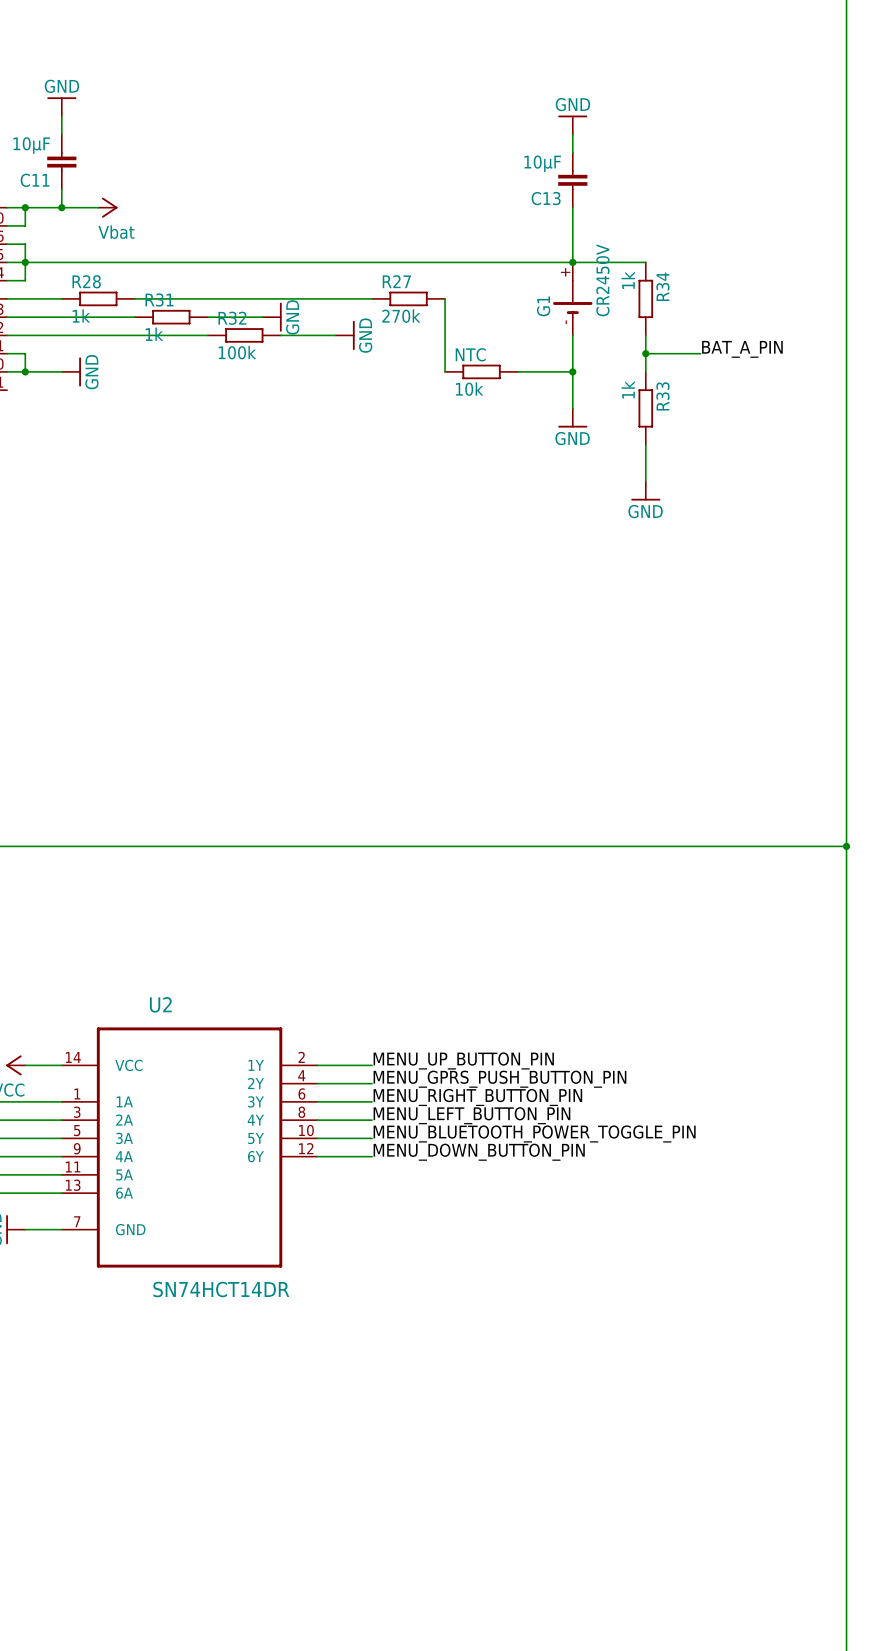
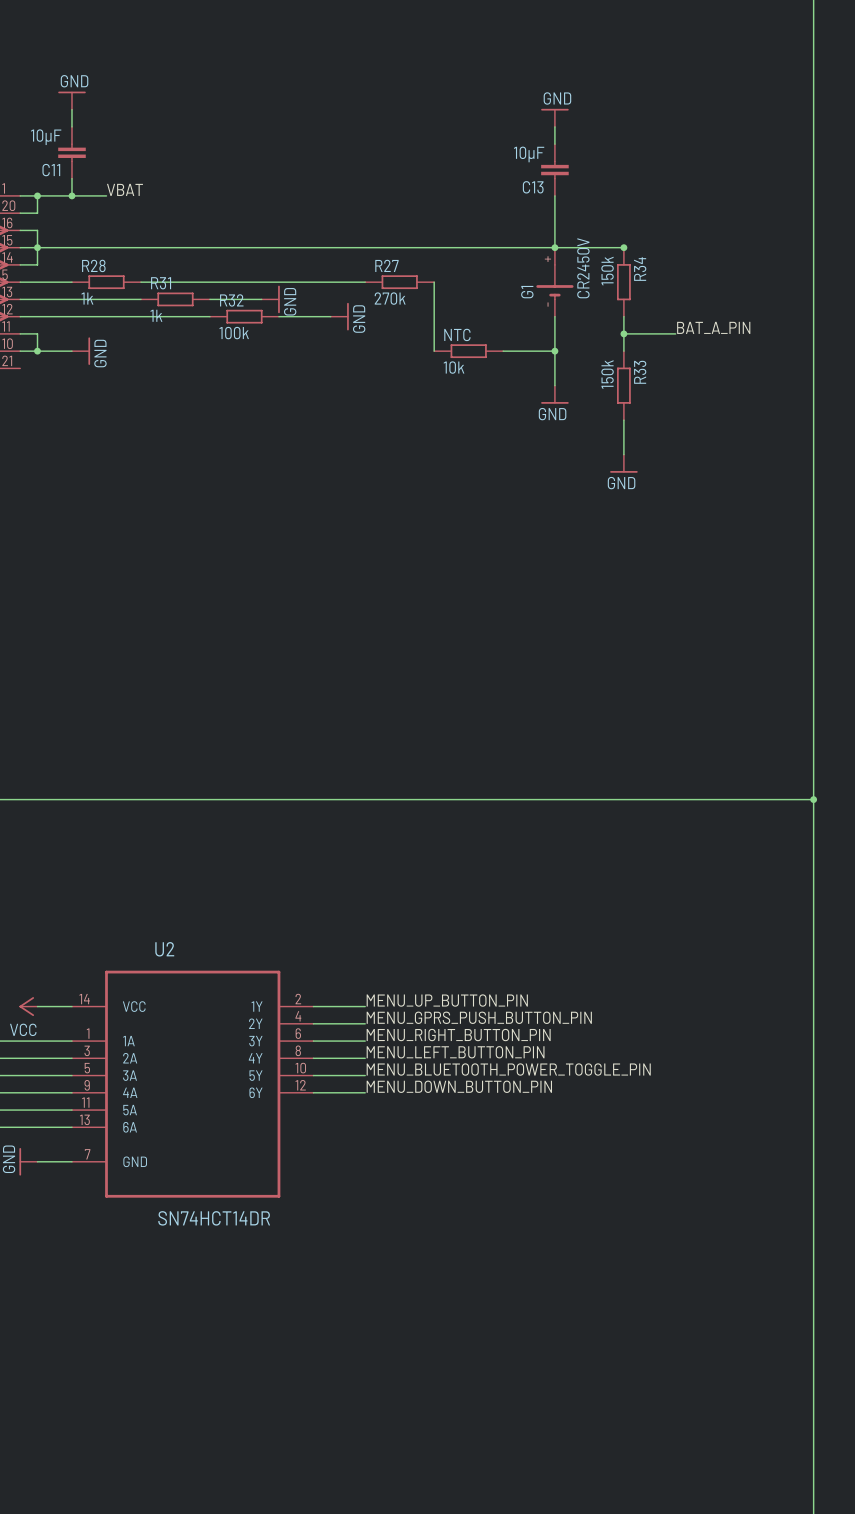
label: none -> VBAT (124, 189)
power symbol: Vbat (107, 207) -> none
junction: none -> (623, 247)
R34 value: 1k (628, 280) -> 150k (607, 271)
R33 value: 1k (628, 389) -> 150k (607, 374)

